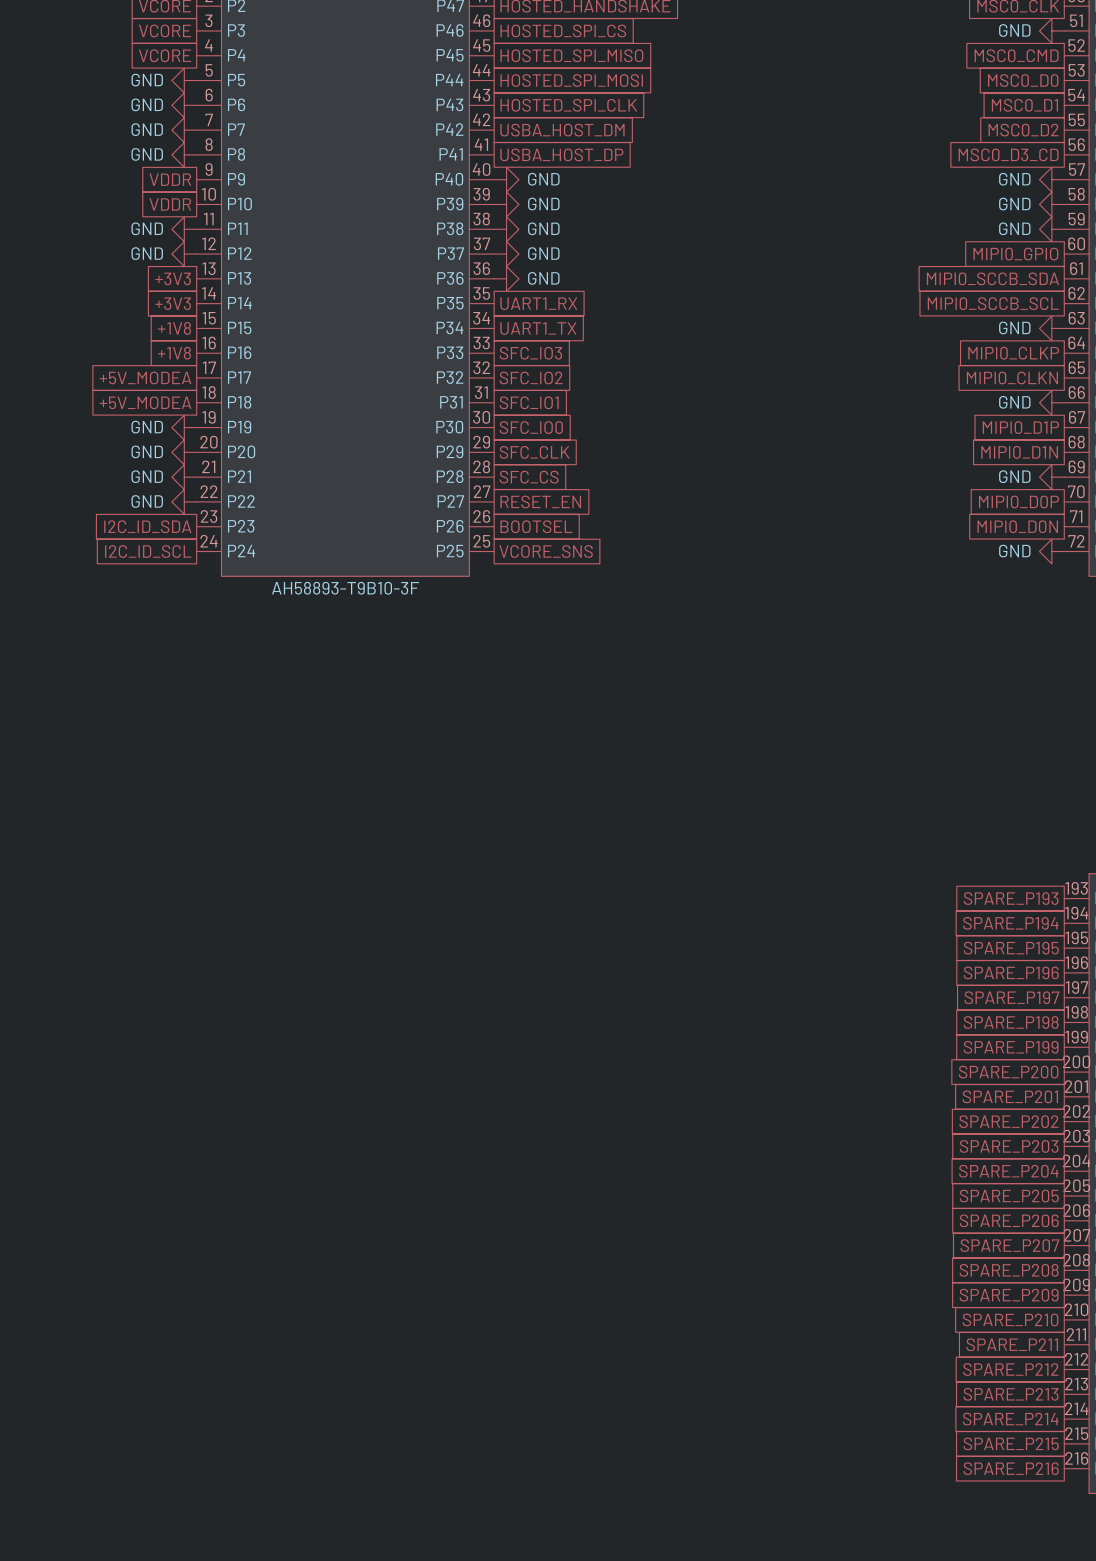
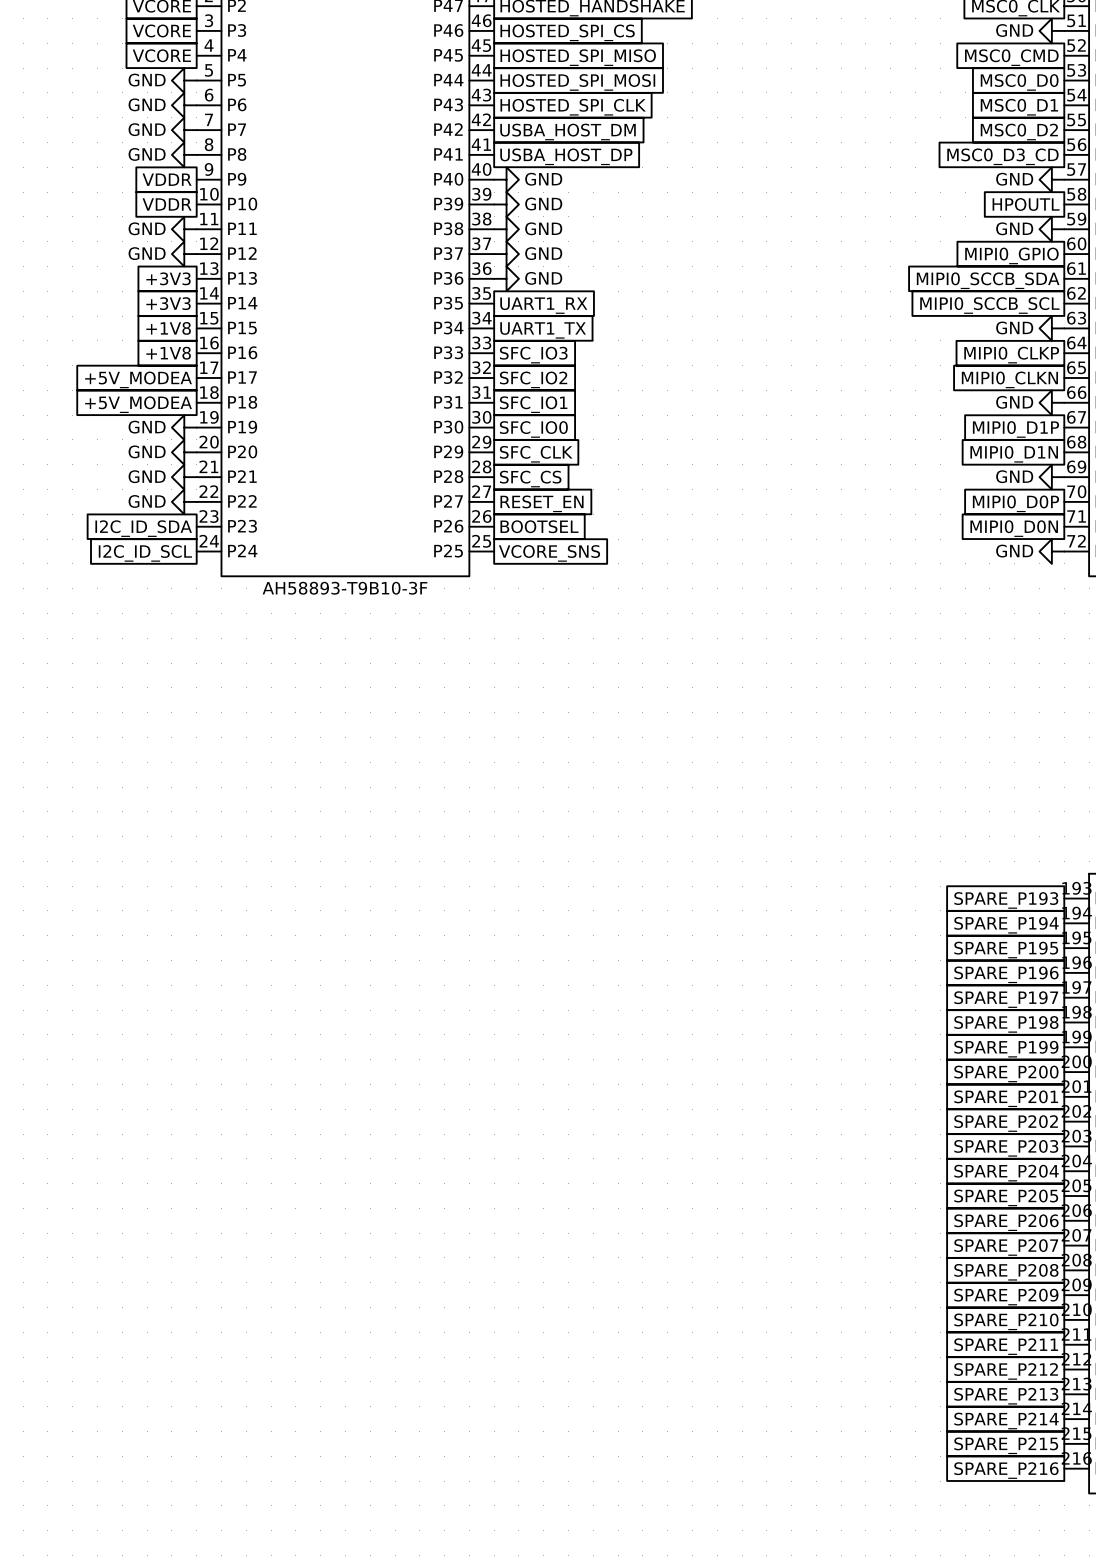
global label: none -> HPOUTL (1026, 204)
power symbol: GND (1051, 204) -> none

